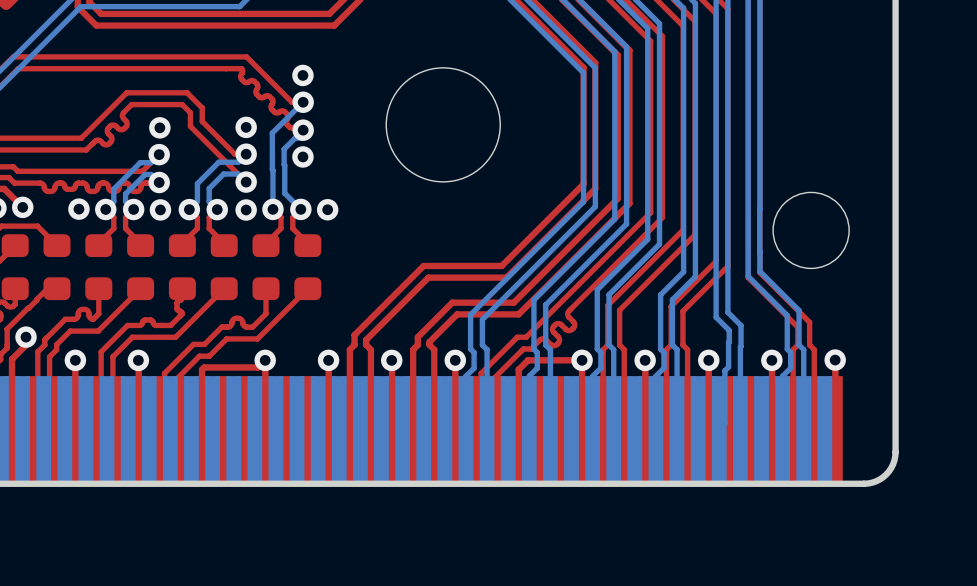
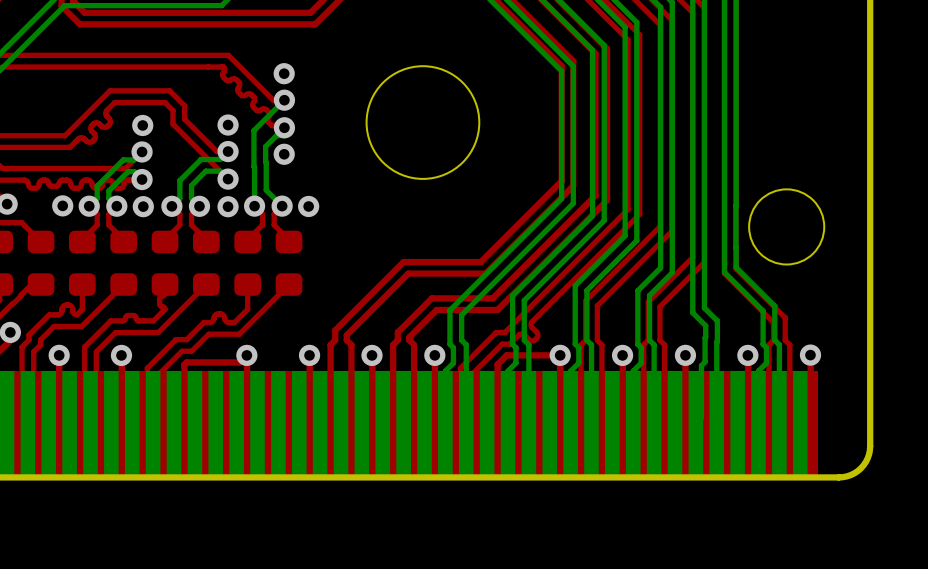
top track: (568, 311) (568, 316) (574, 324) (571, 329) (567, 330) (559, 323) (555, 324) -> (547, 306) (533, 320)

